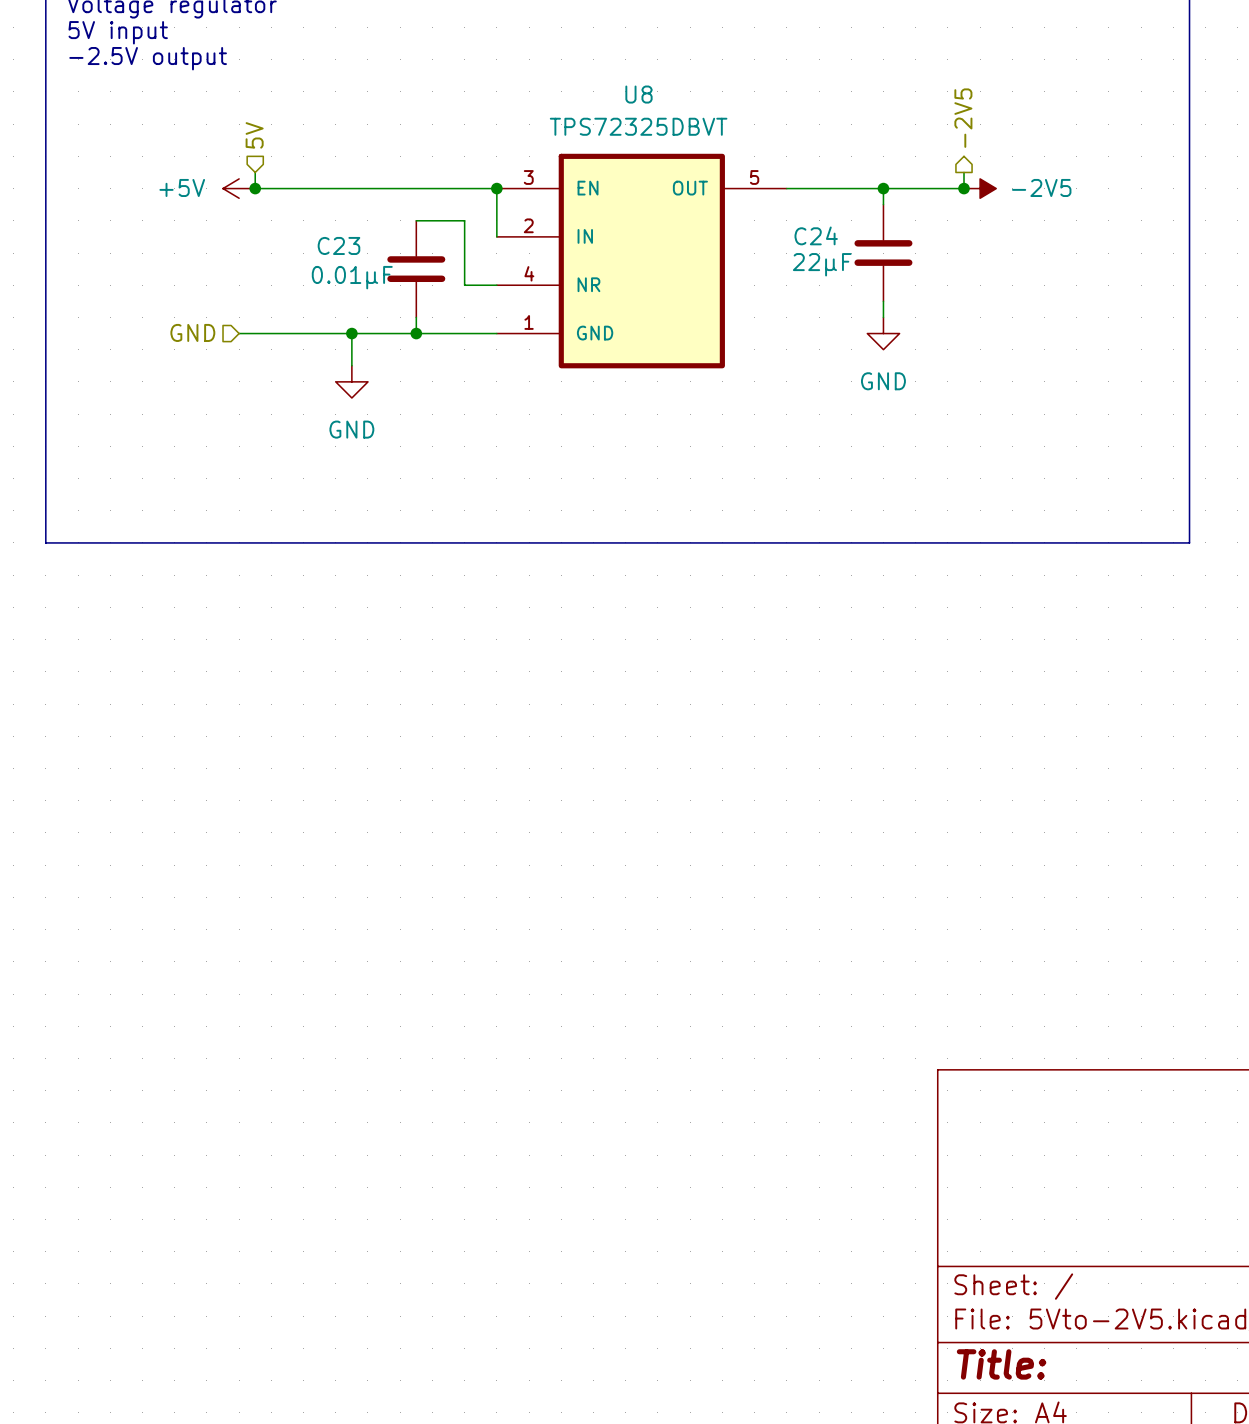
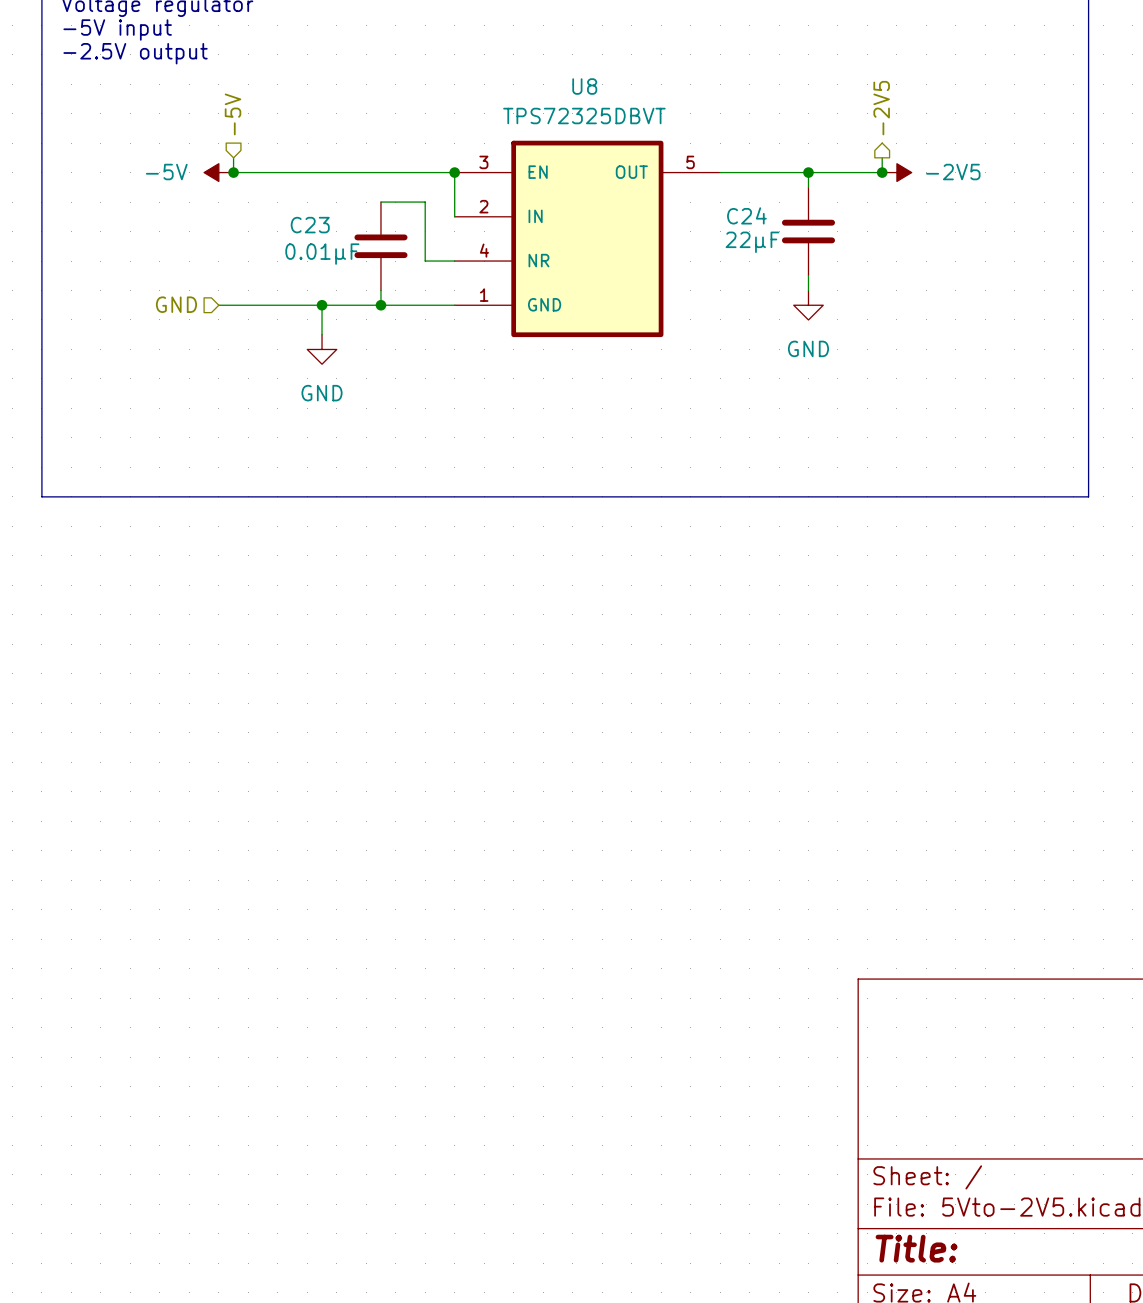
text: 5V input (118, 32) -> -5V input (117, 29)
hierarchical label: 5V (254, 135) -> -5V (233, 114)
power symbol: +5V (239, 188) -> -5V (218, 172)

